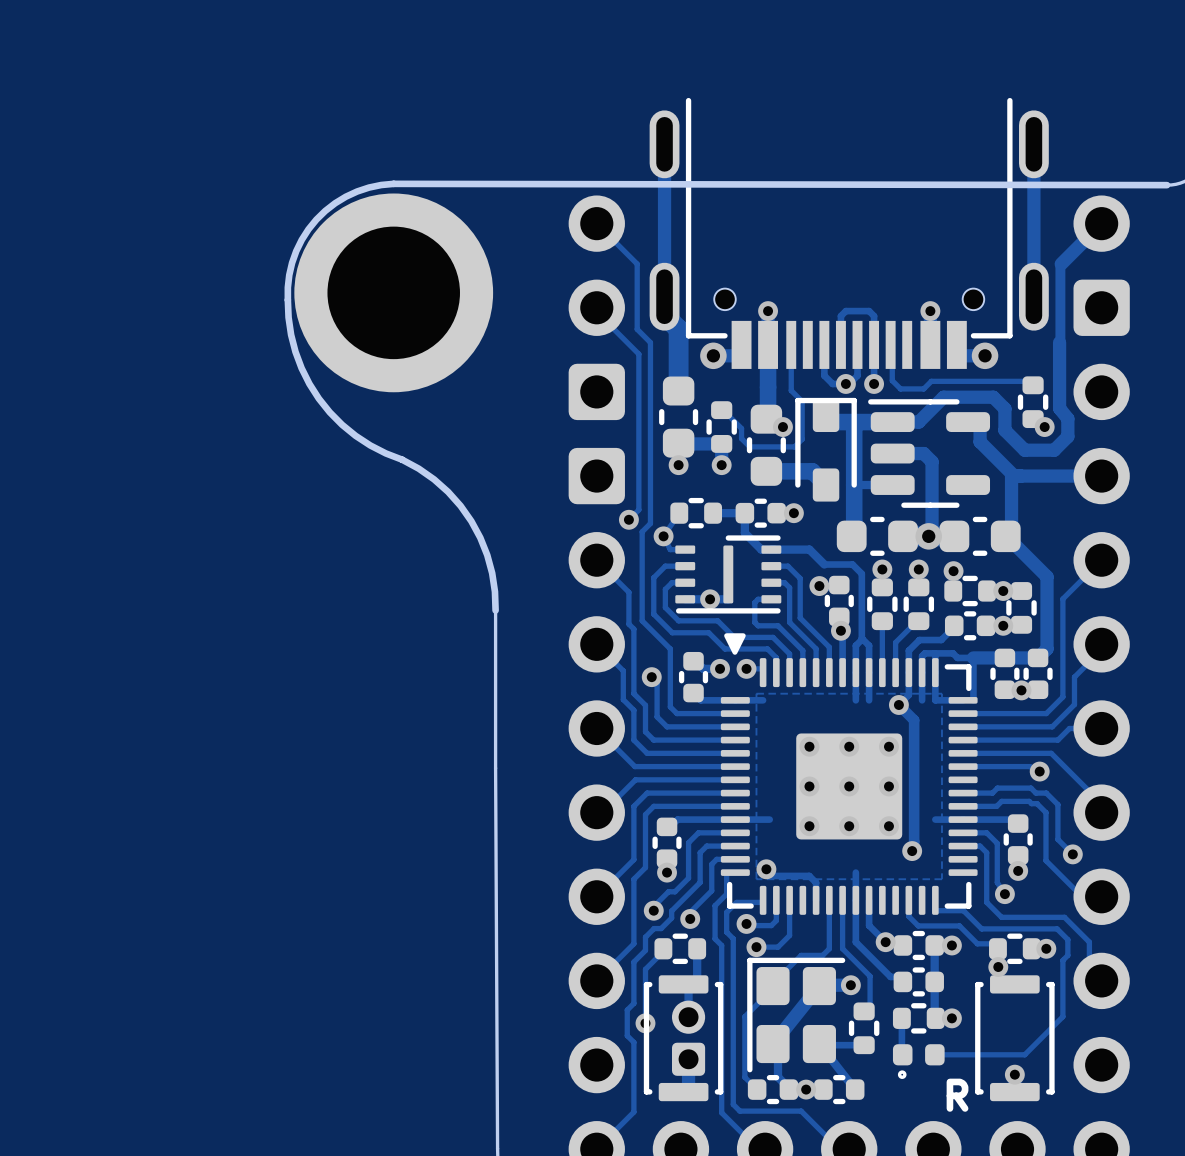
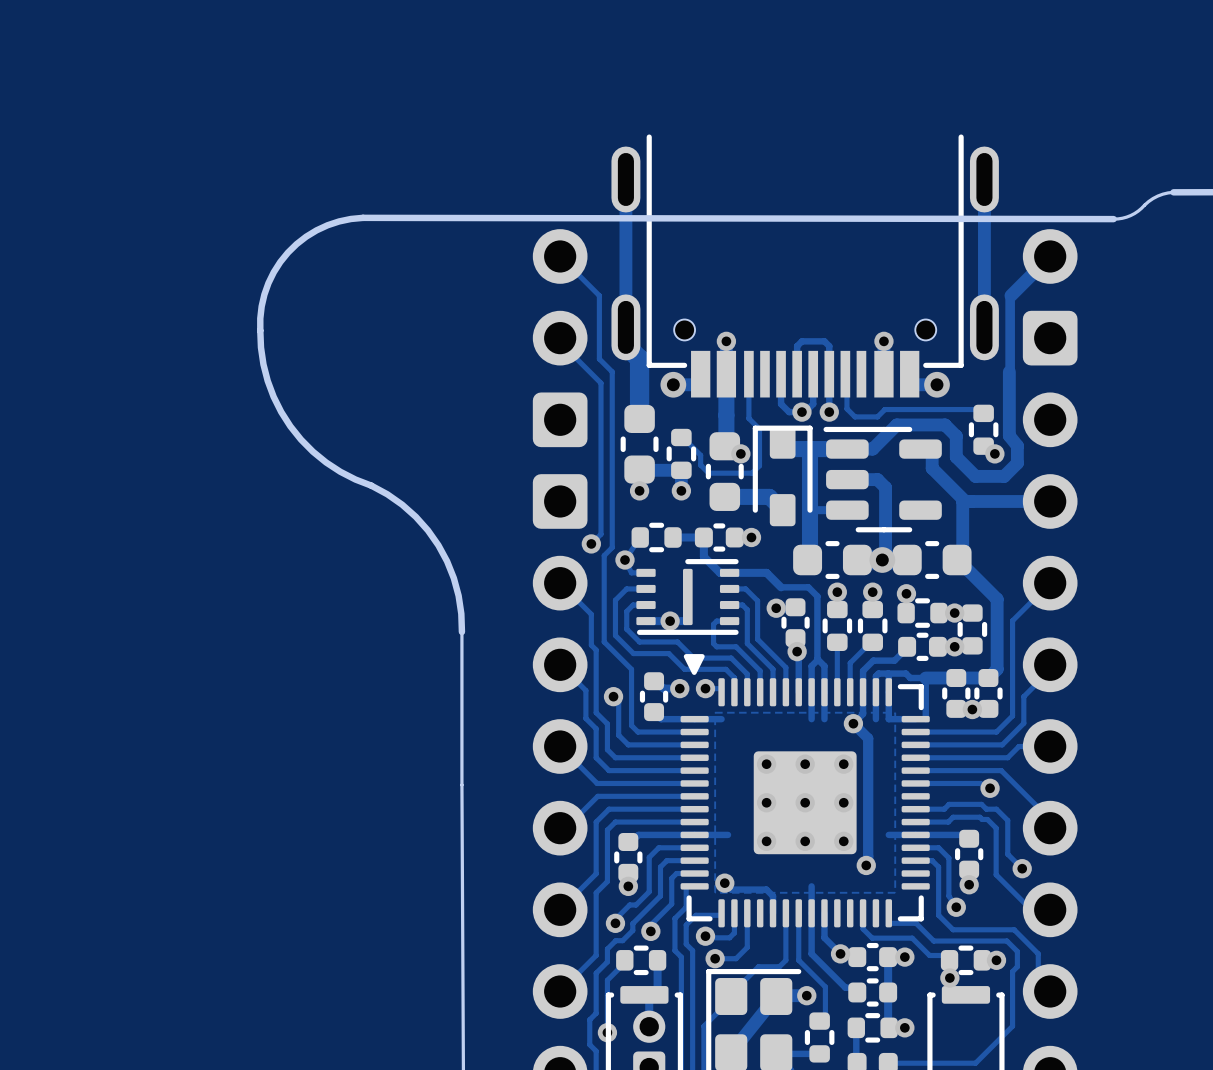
part: (393, 292) -> none

